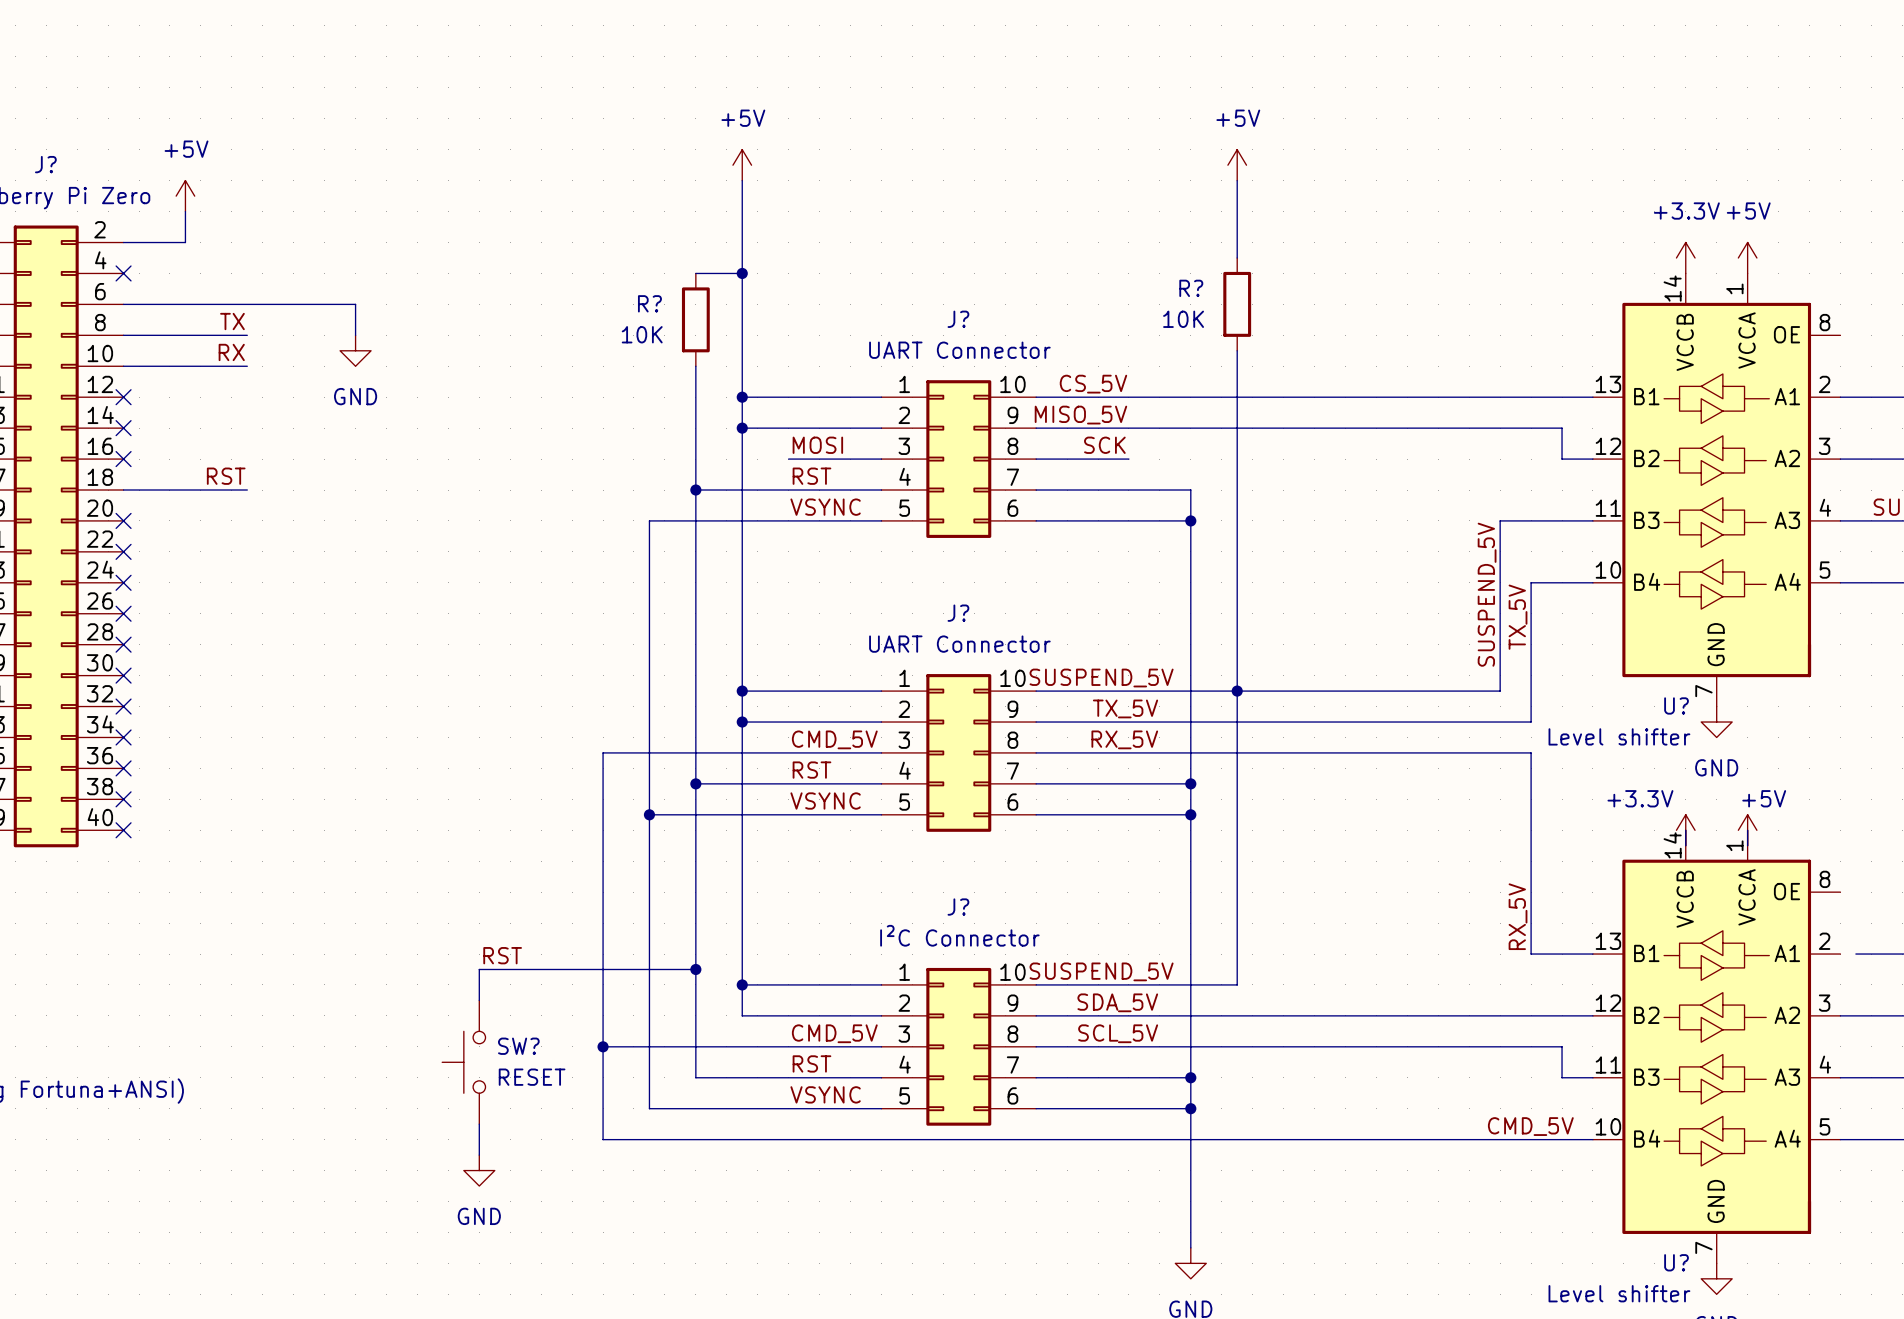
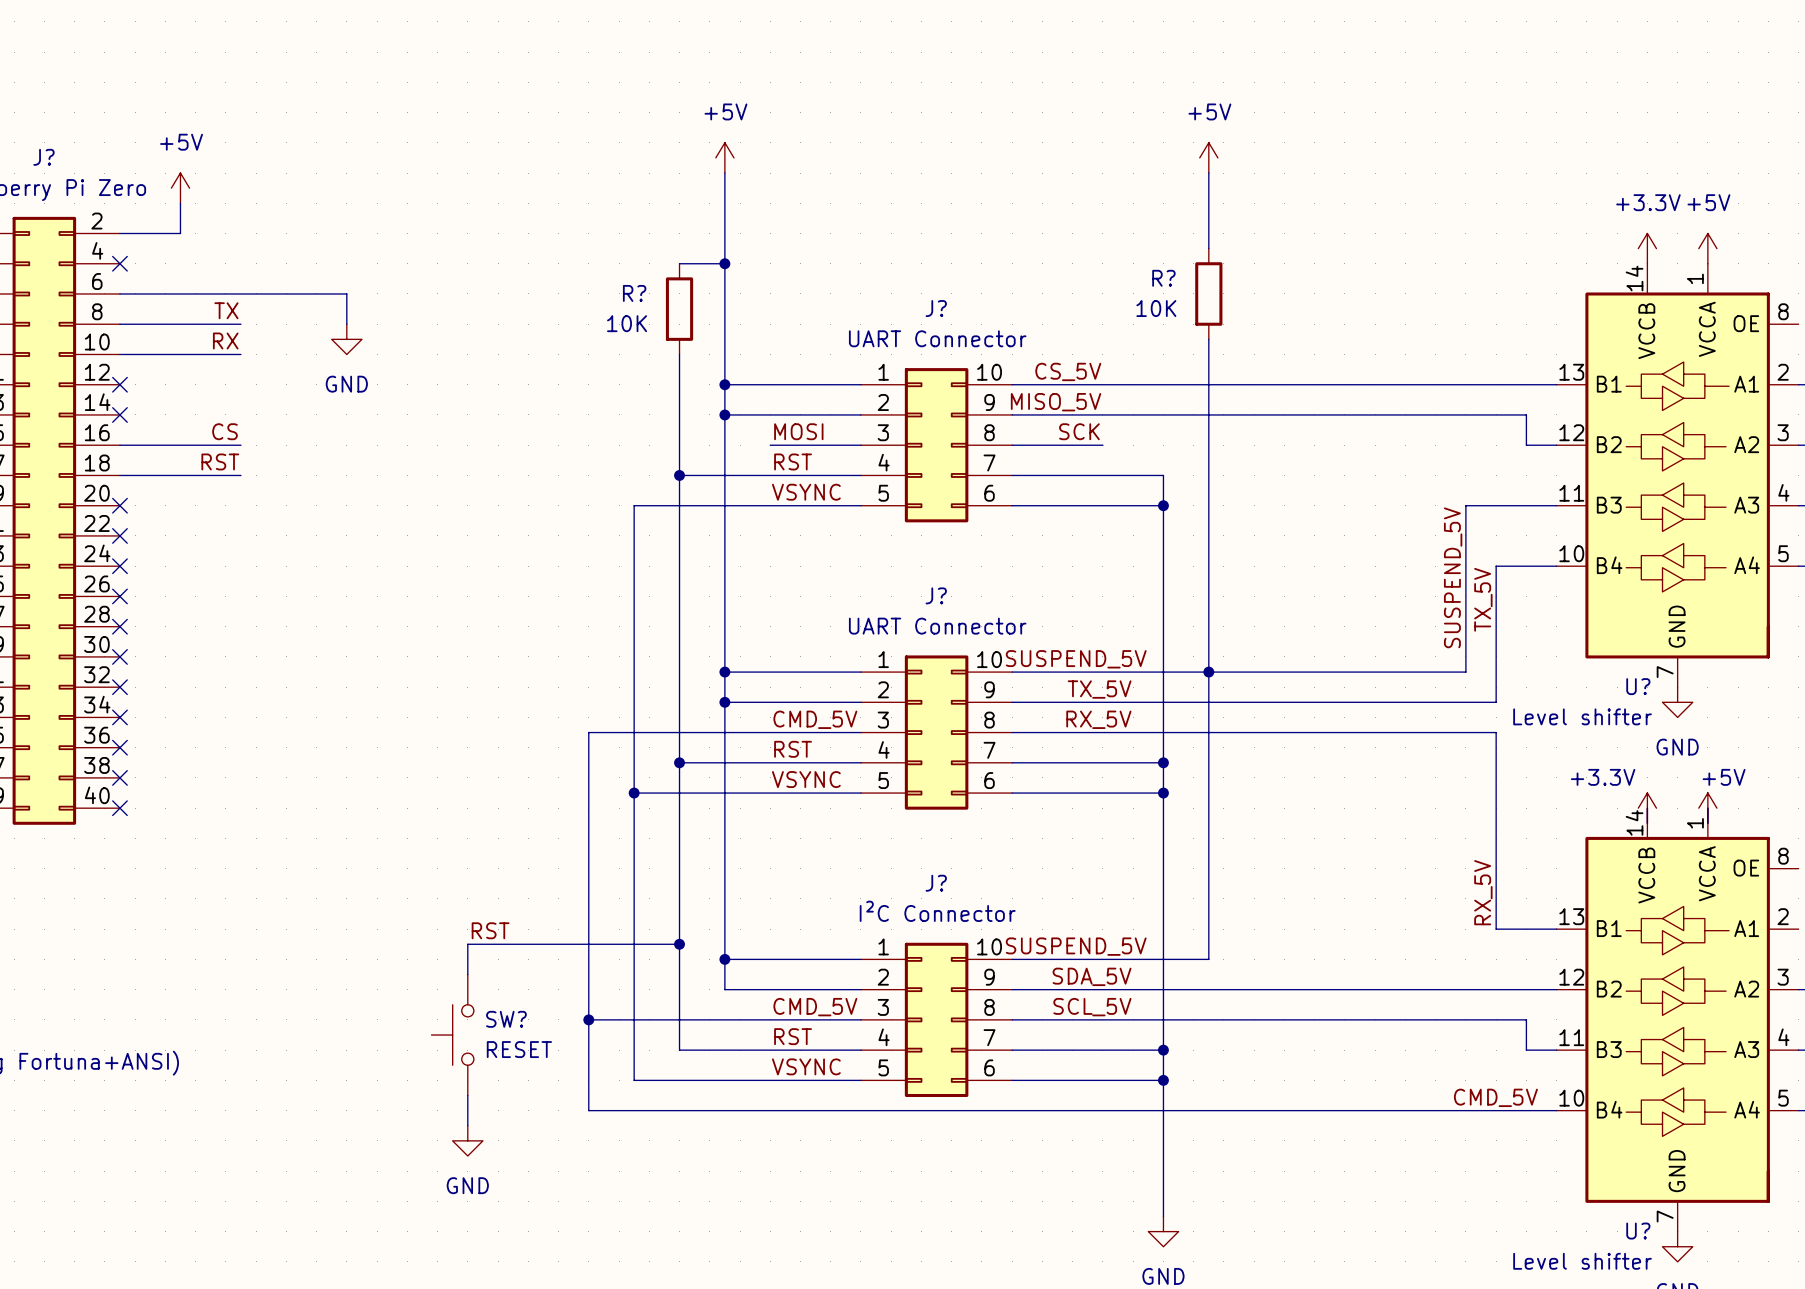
label: none -> CS (225, 431)
wire: none -> (119, 445) (240, 445)
no-connect mark: (123, 459) -> none

